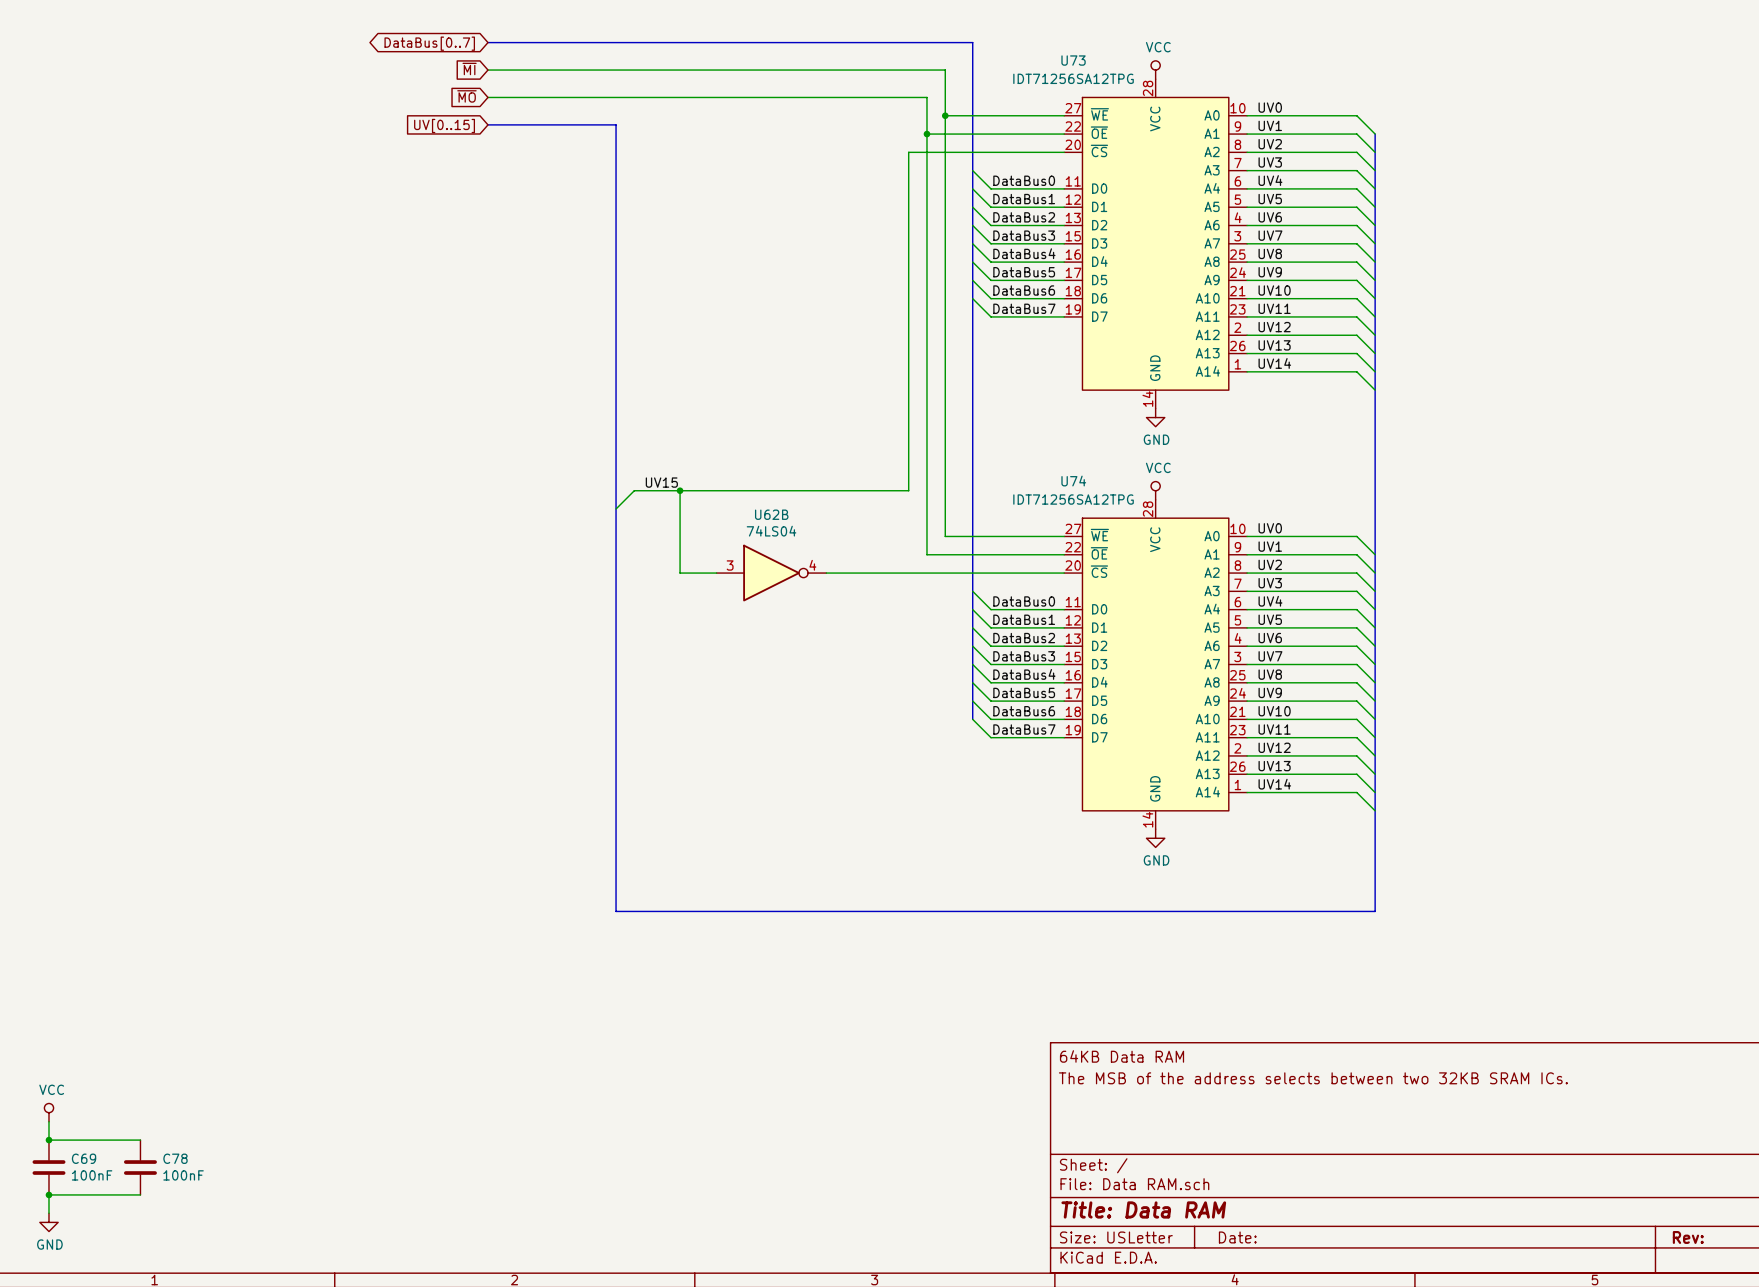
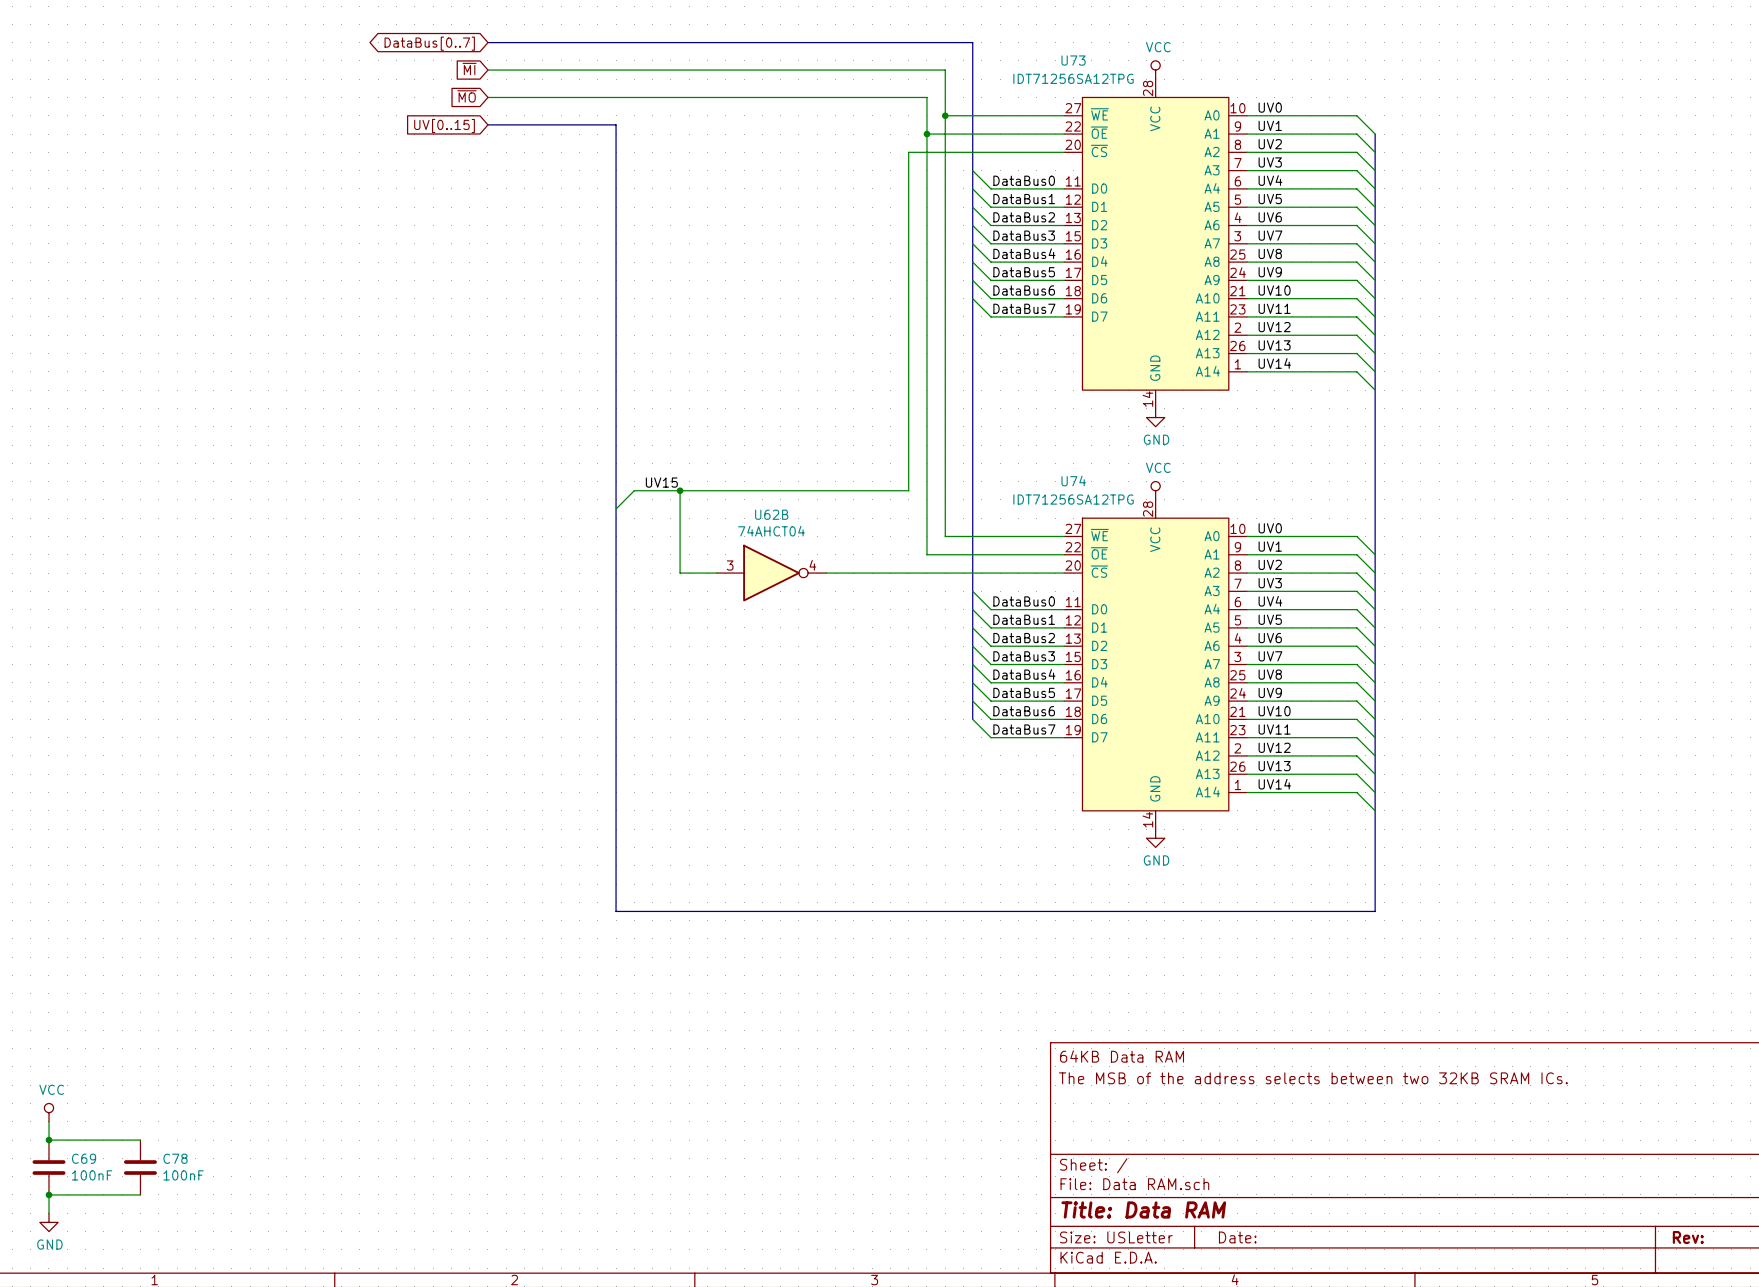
U62B value: 74LS04 (771, 531) -> 74AHCT04 (771, 531)

